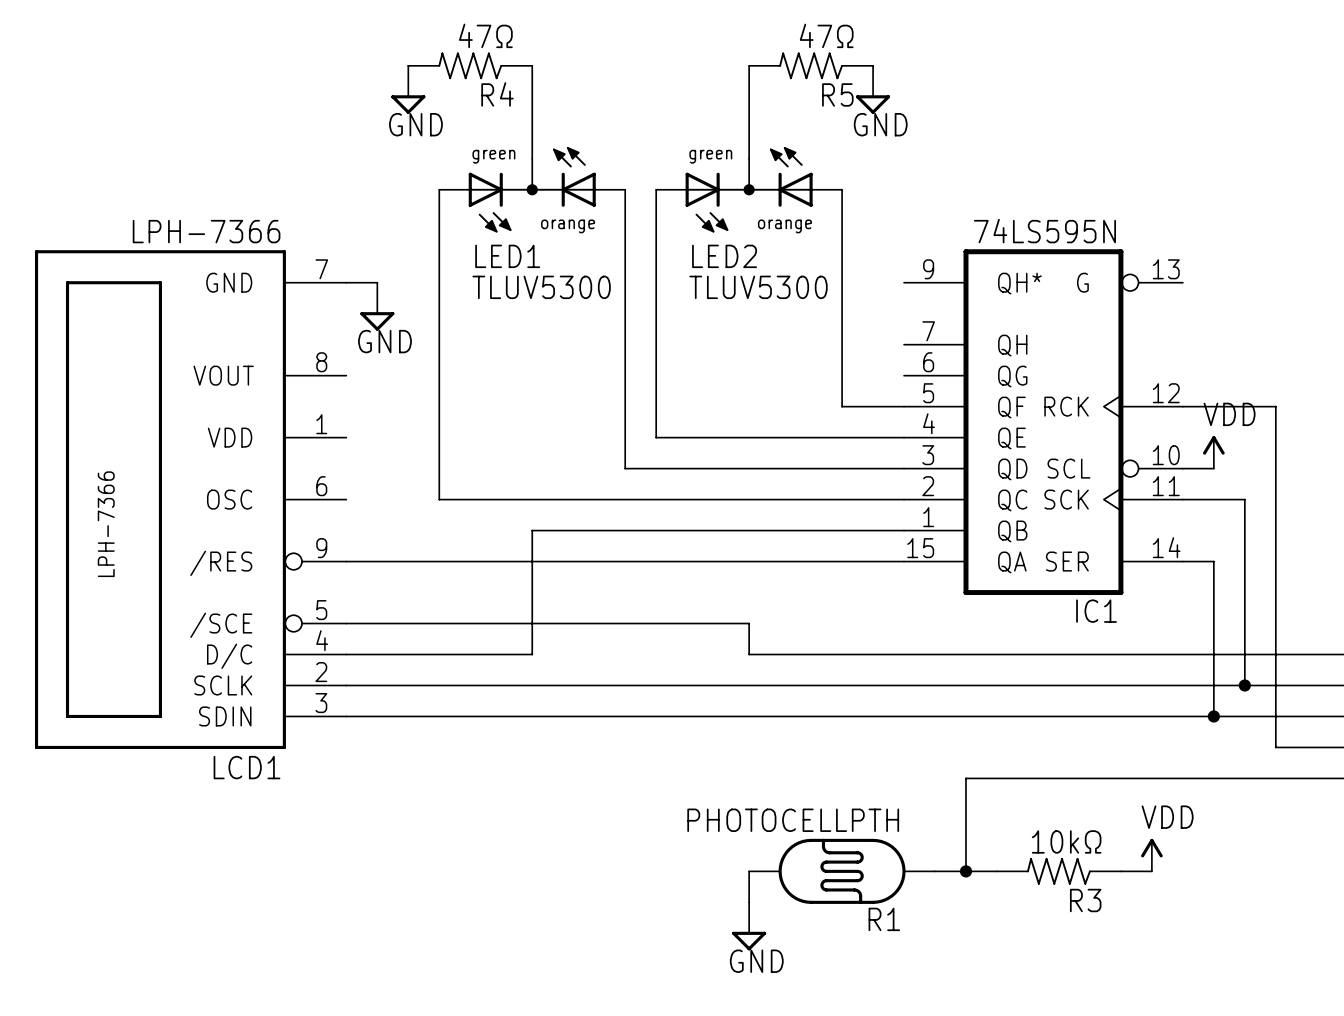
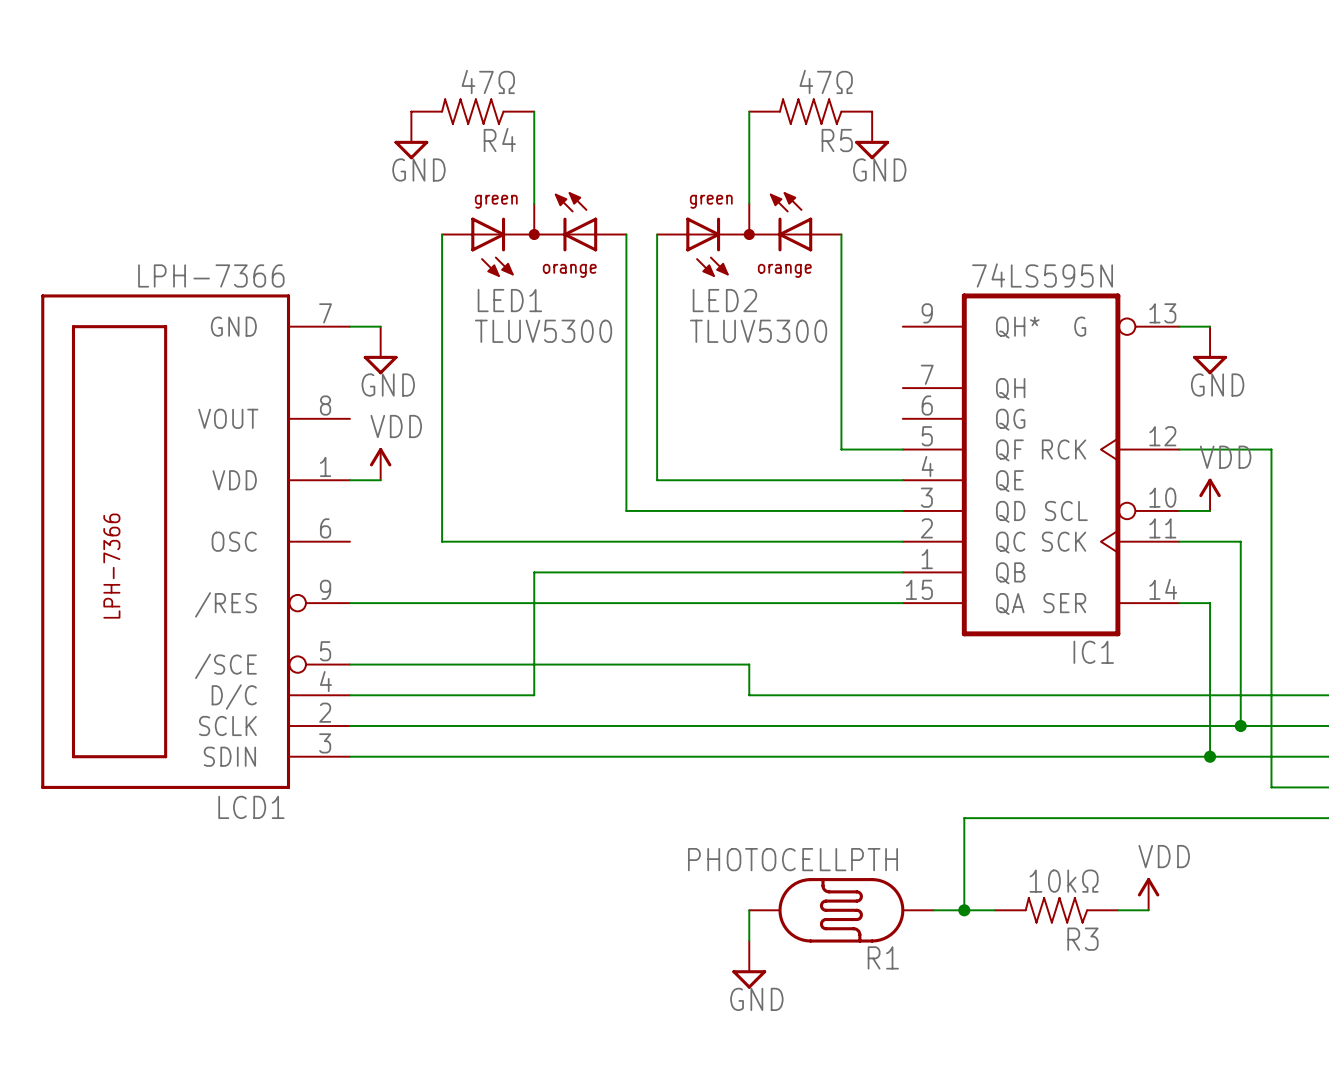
wire: none -> (1179, 326) (1210, 326)
power symbol: none -> GND (1210, 350)
power symbol: none -> VDD (380, 464)
wire: none -> (349, 480) (380, 480)

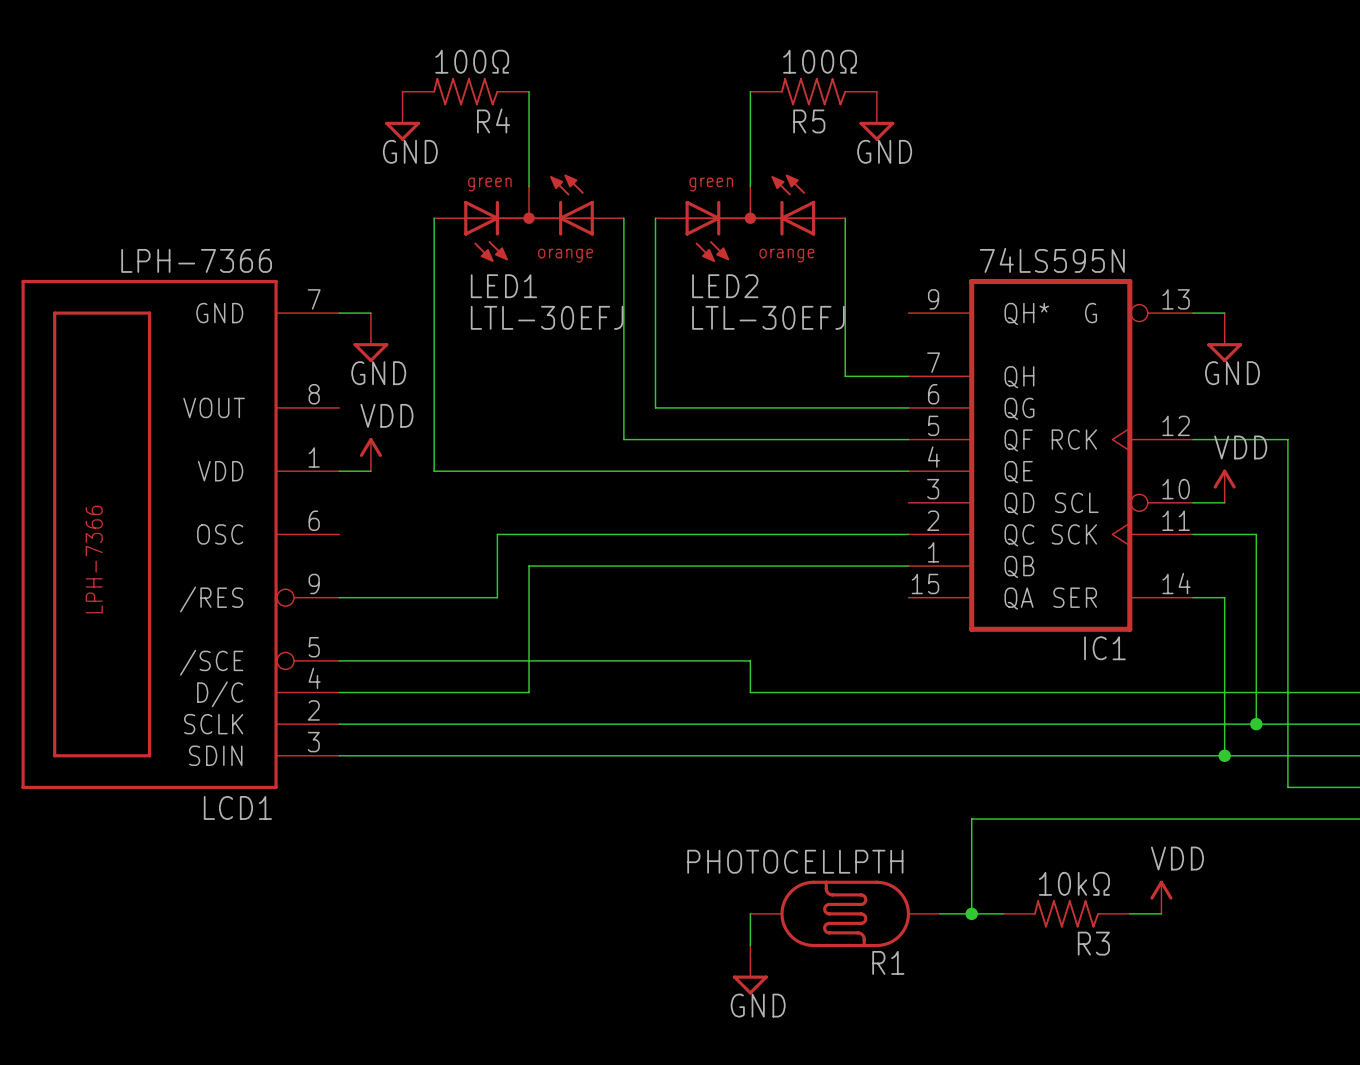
R4 value: 47Ω (488, 81) -> 100Ω (472, 61)
R5 value: 47Ω (826, 81) -> 100Ω (820, 61)
R5 name position: R5 (837, 140) -> R5 (809, 121)
LED1 value: TLUV5300 (543, 331) -> LTL-30EFJ (547, 317)
LED2 value: TLUV5300 (758, 331) -> LTL-30EFJ (768, 317)
wire: (841, 388) (841, 449) -> (845, 376) (908, 376)
wire: (657, 418) (657, 480) -> (434, 471) (655, 471)
wire: none -> (655, 407) (908, 407)
wire: (626, 449) (626, 510) (902, 510) -> (623, 439) (845, 439)
wire: (442, 480) (442, 541) (503, 541) -> (497, 597) (497, 534)
wire: (503, 603) (902, 603) -> none

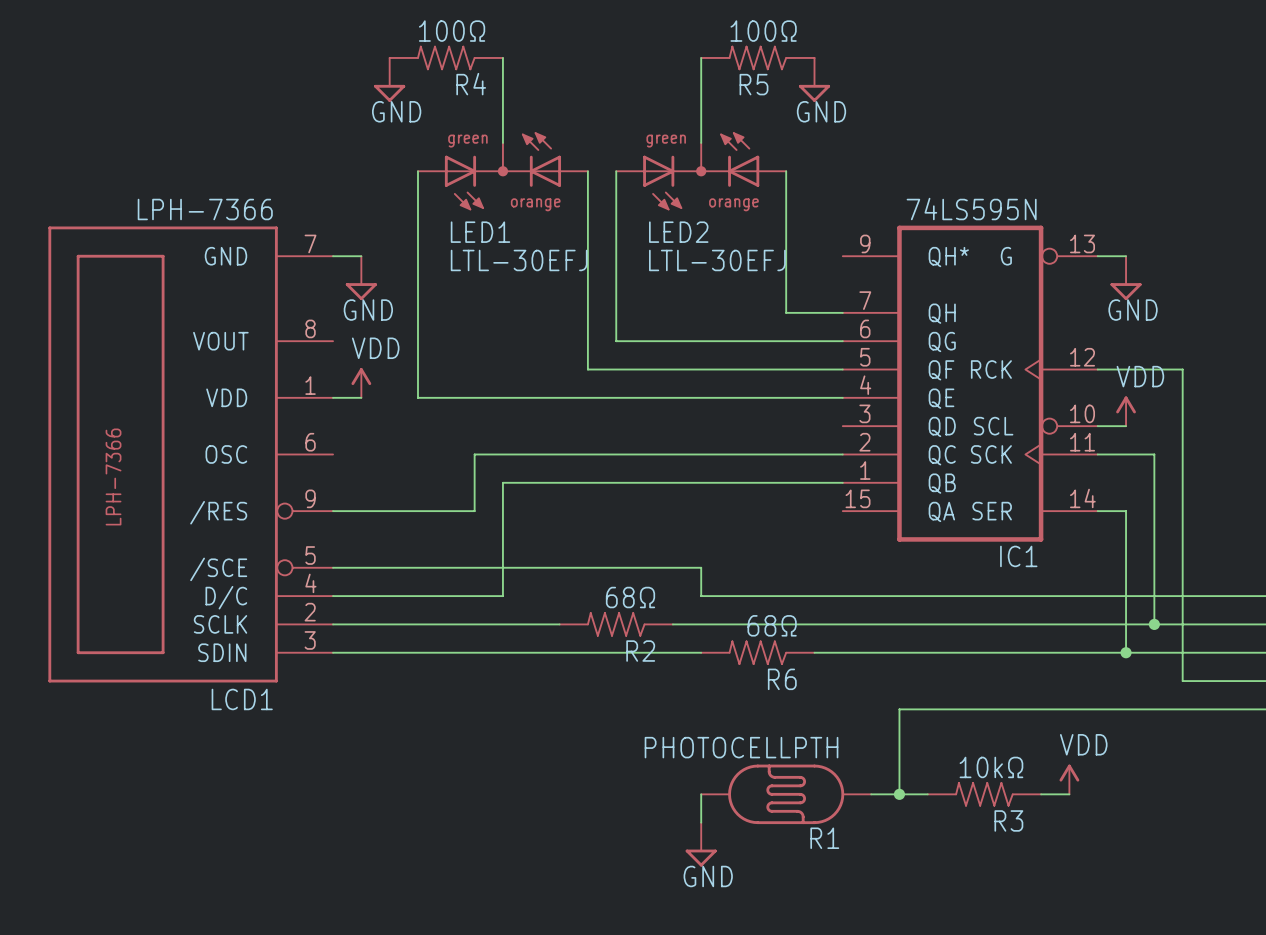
R2: none -> 68Ω (616, 624)
R6: none -> 68Ω (757, 652)

